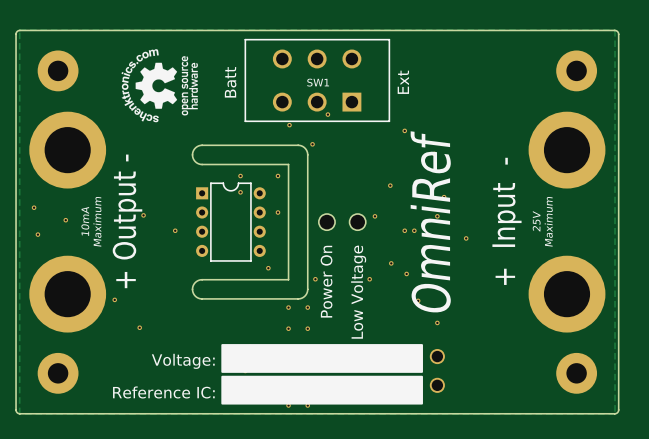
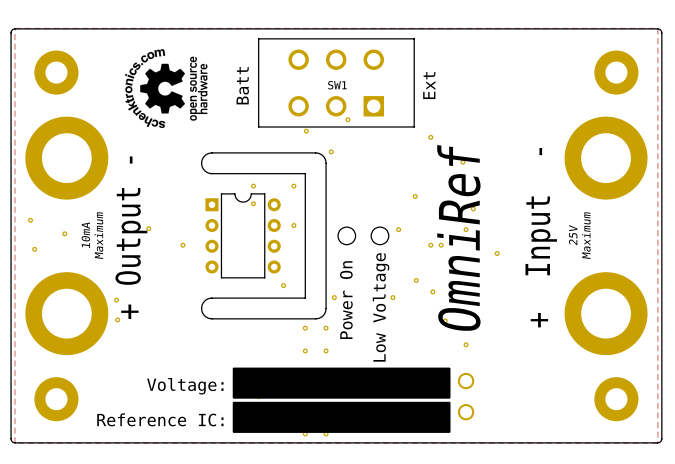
part position: (139, 327) -> (116, 300)

